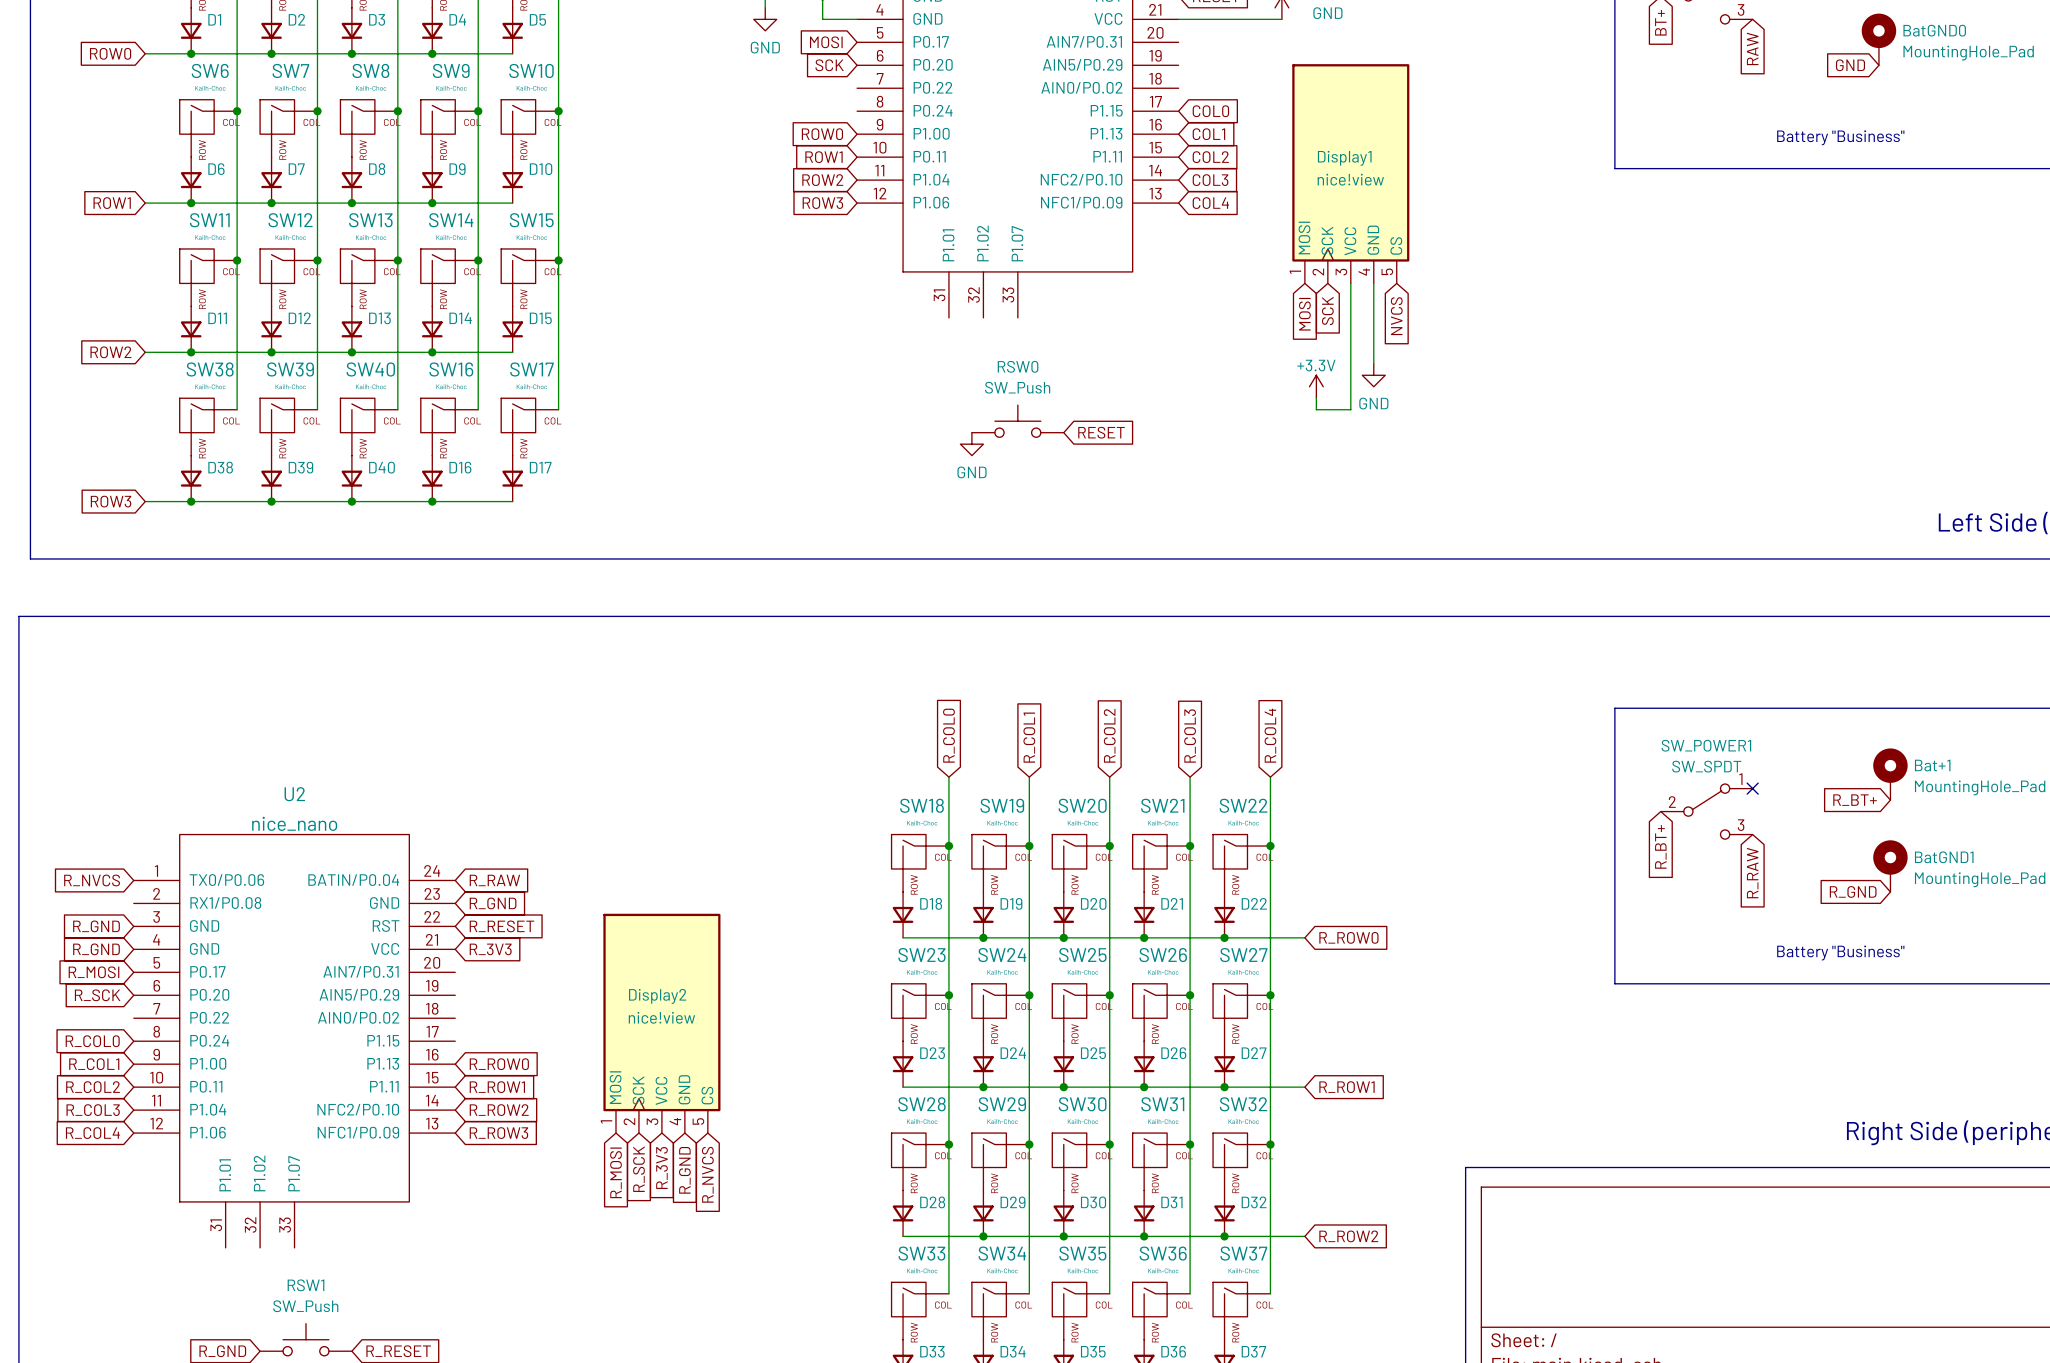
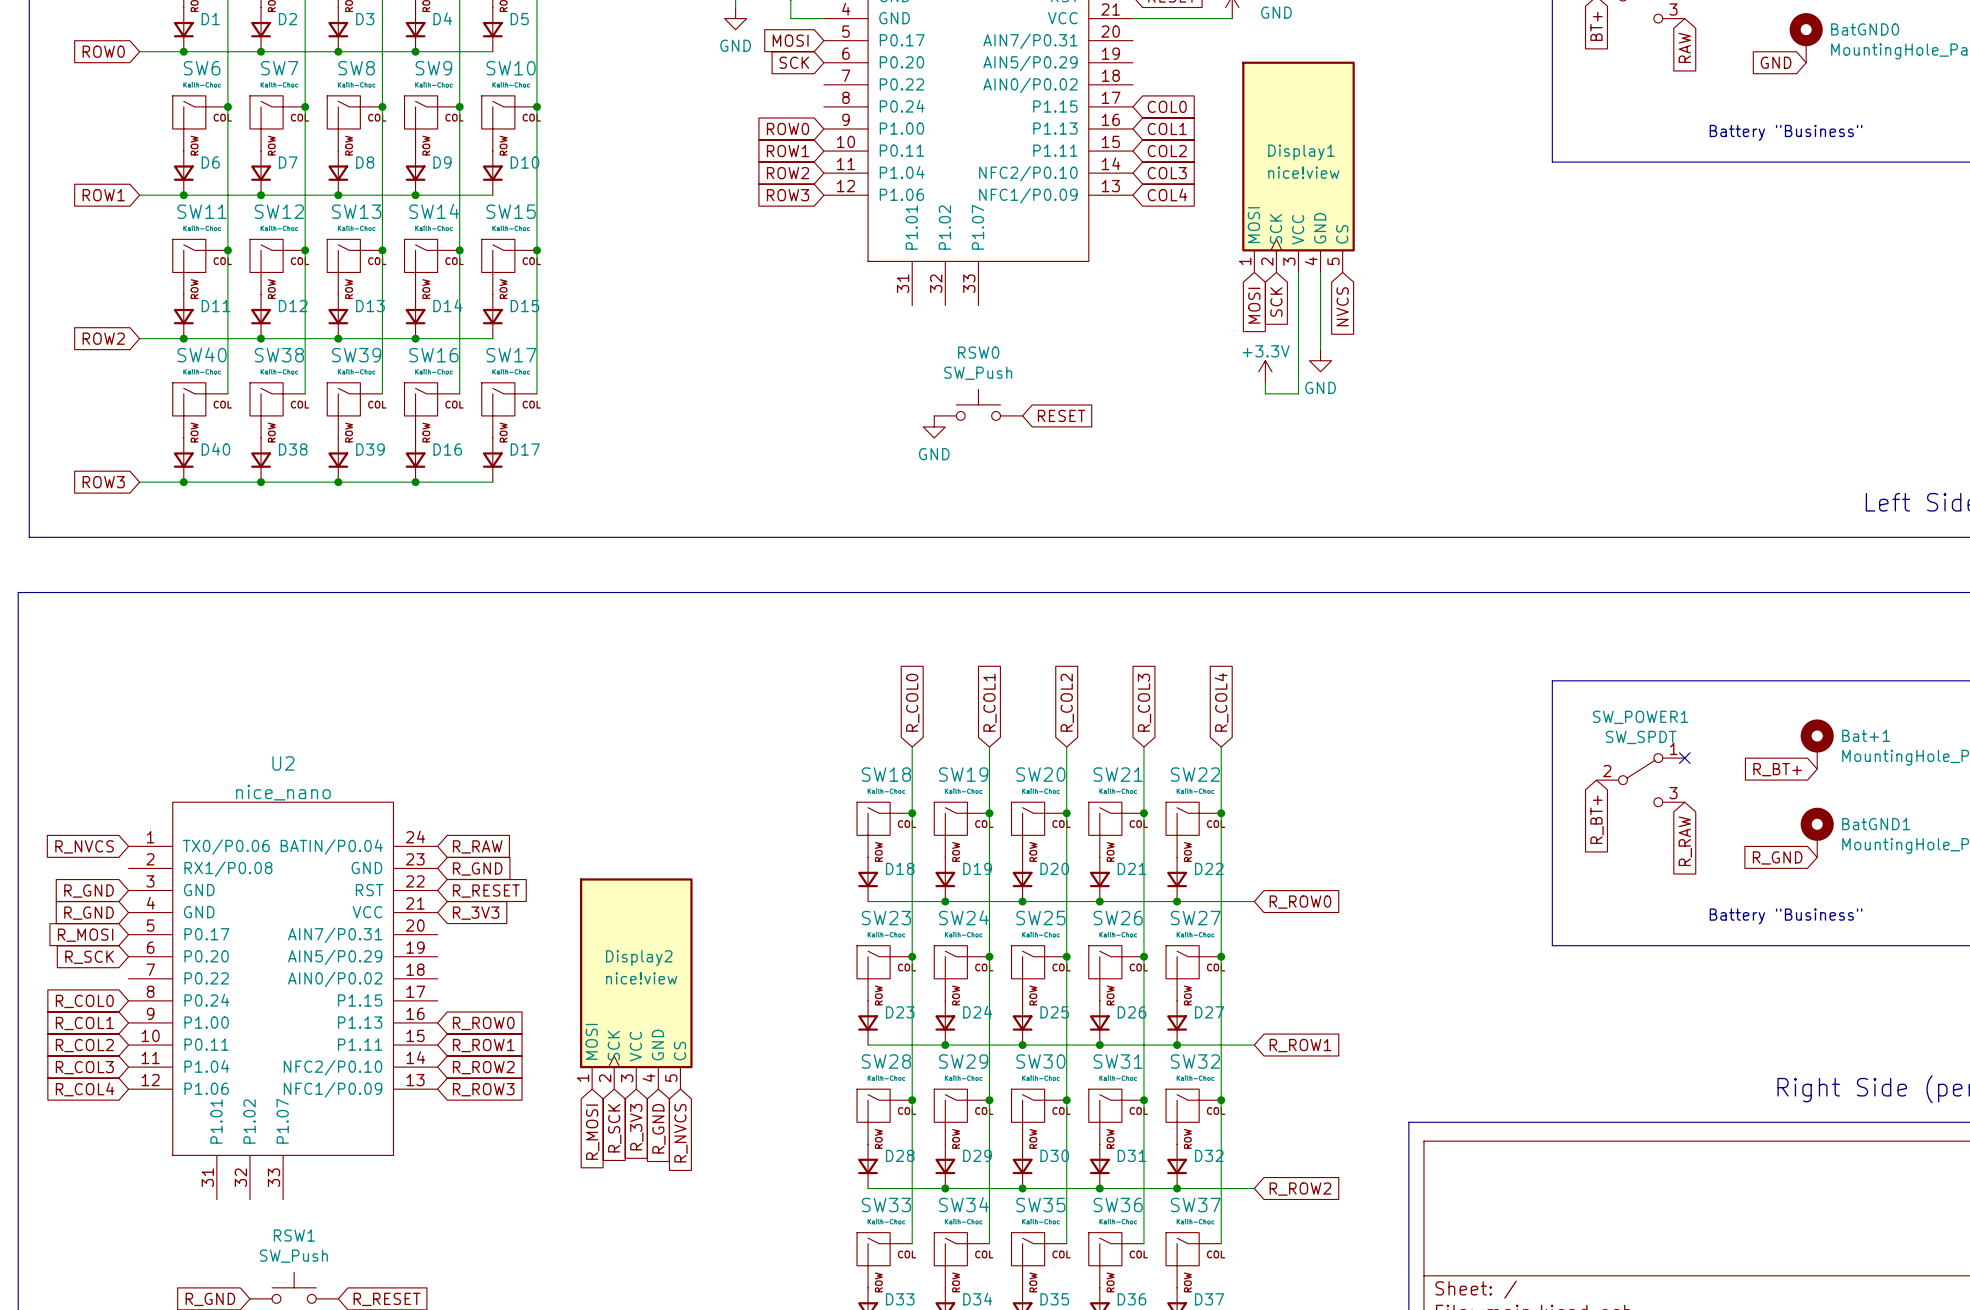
SW38 name: SW38 (210, 369) -> SW40 (202, 354)
SW39 name: SW39 (290, 369) -> SW38 (279, 355)
SW40 name: SW40 (370, 369) -> SW39 (356, 355)
D38 name: D38 (220, 467) -> D40 (215, 449)
D39 name: D39 (300, 467) -> D38 (293, 449)
D40 name: D40 (381, 467) -> D39 (370, 449)

